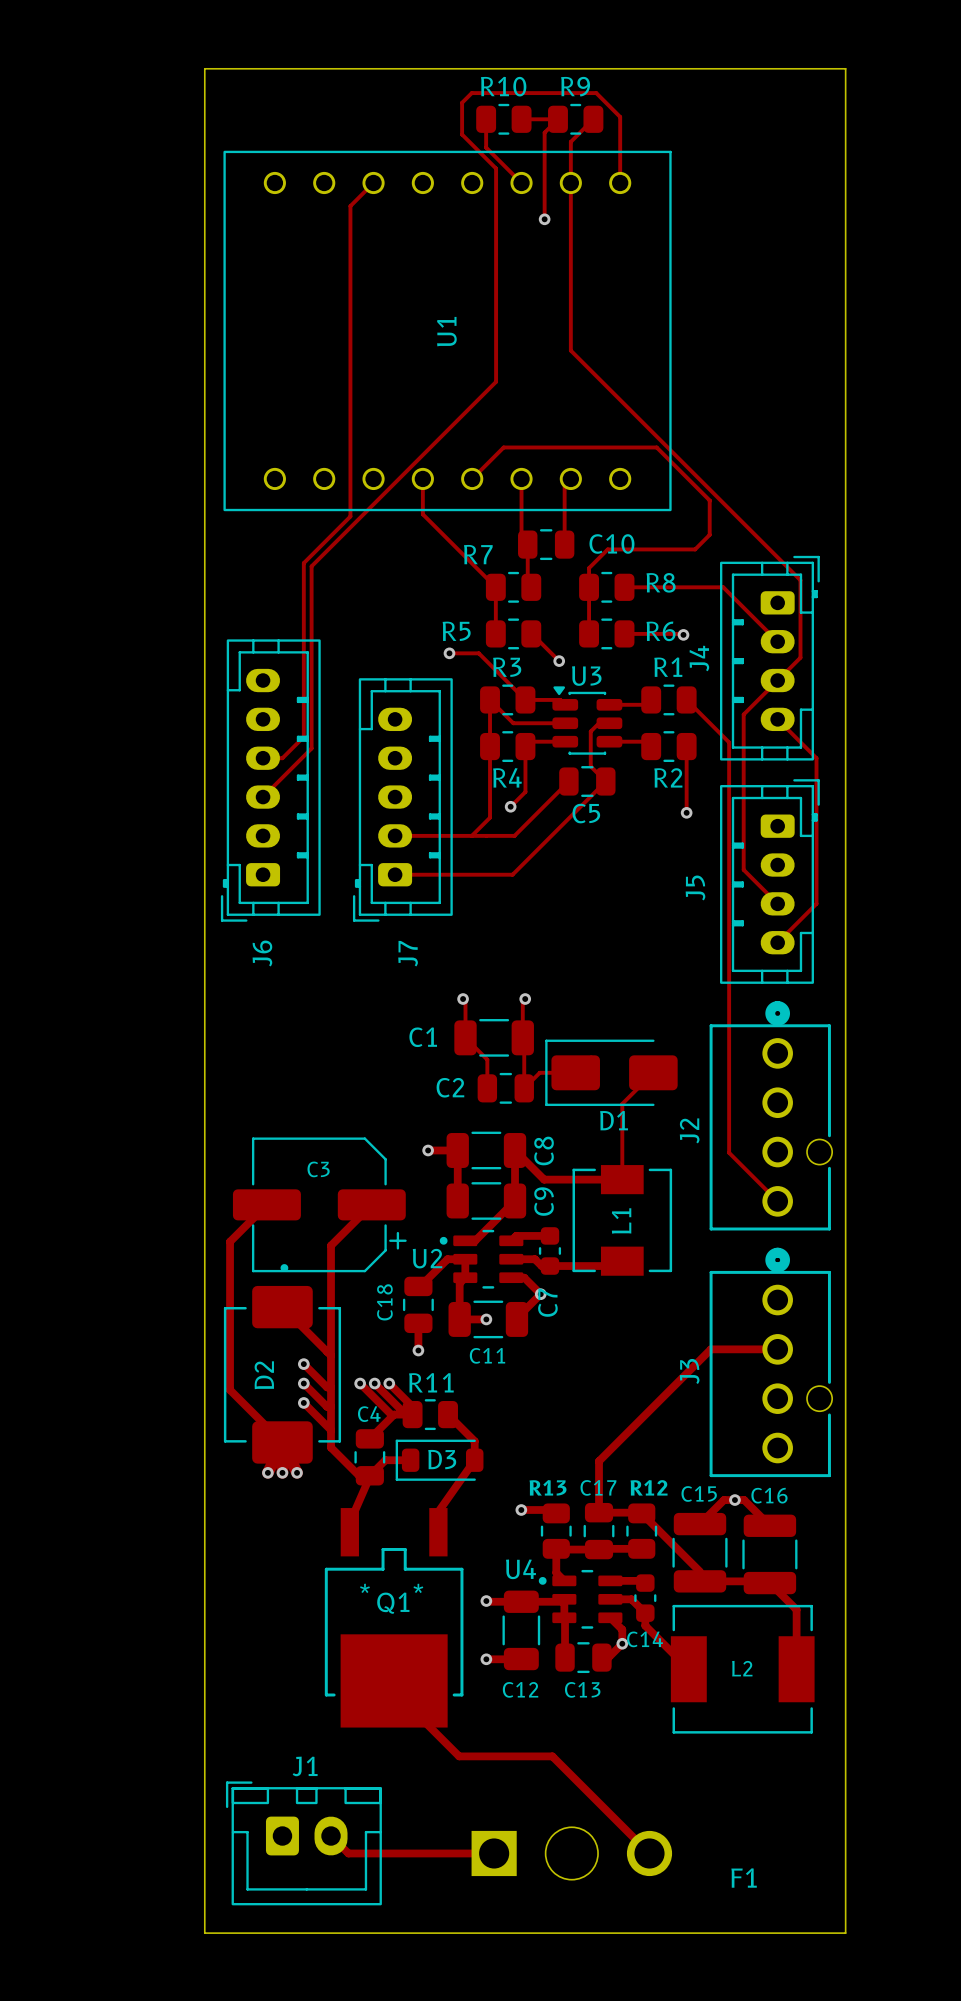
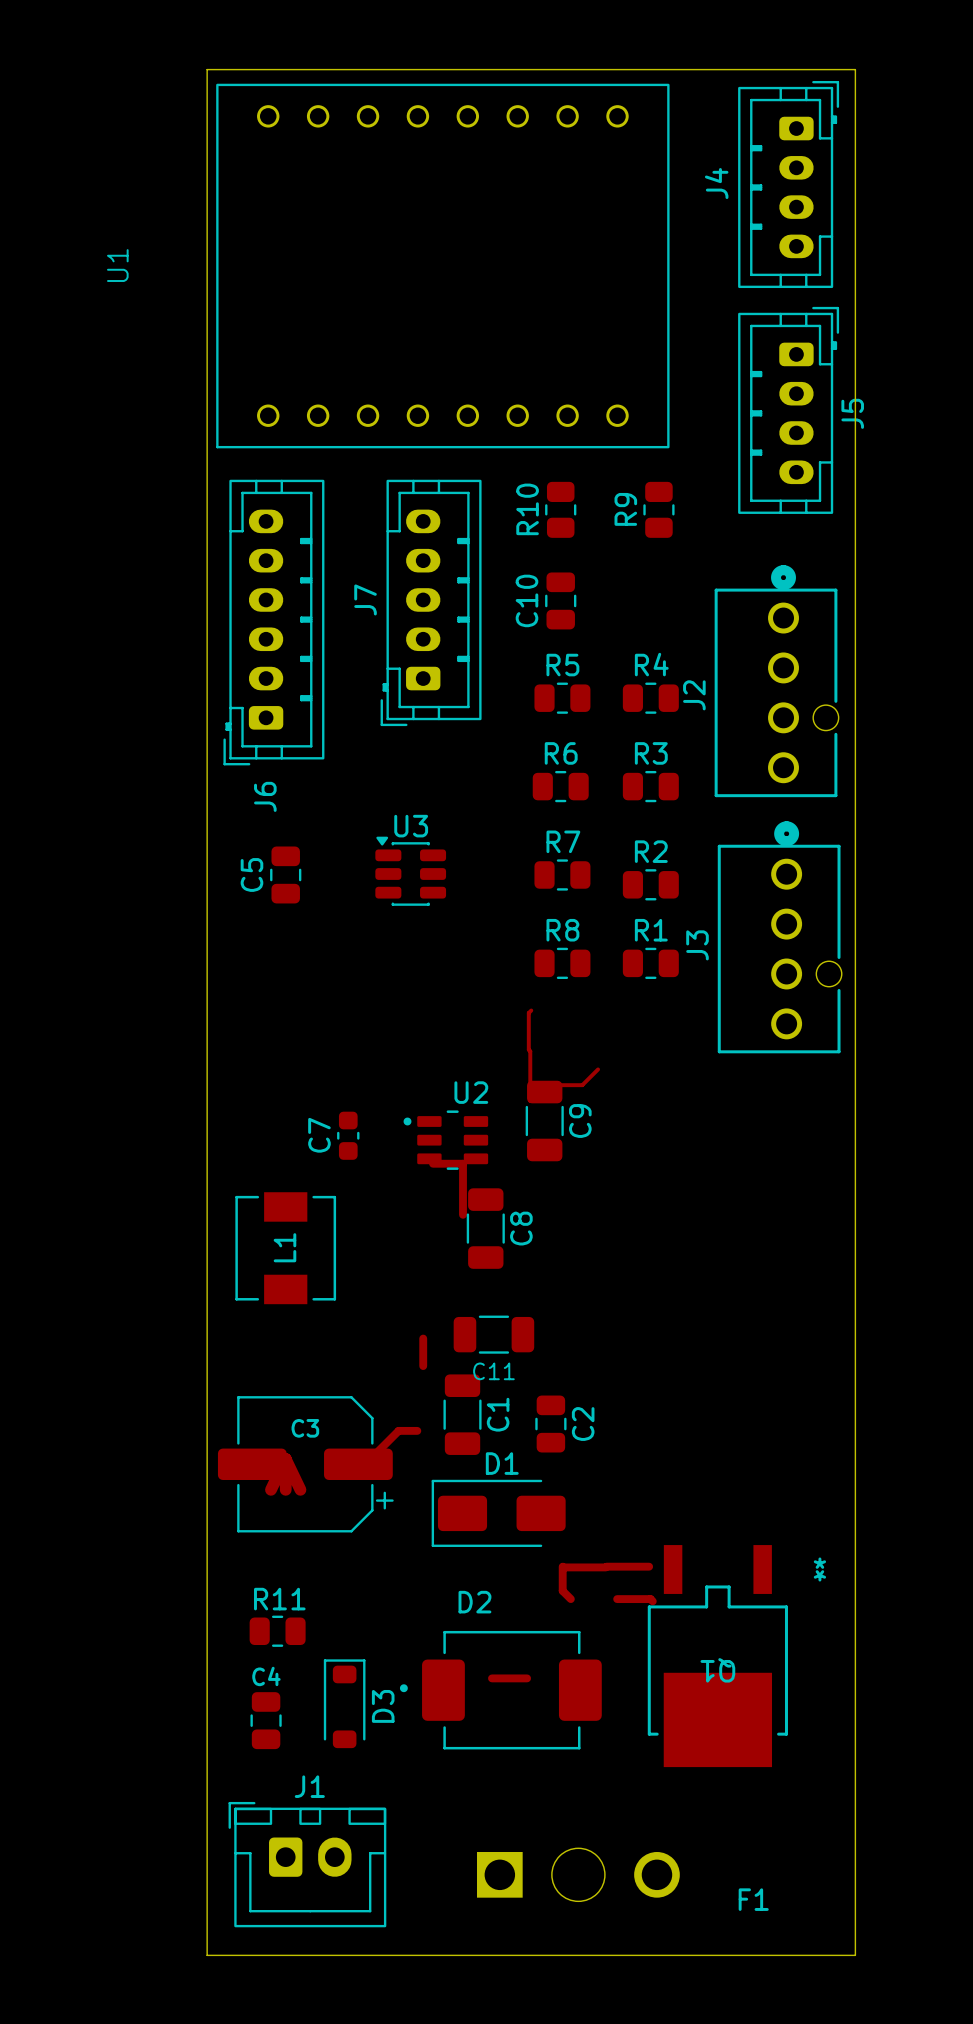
R10 name position: R10 (503, 86) -> R10 (527, 509)
R9 name position: R9 (575, 86) -> R9 (625, 509)
track: (486, 119) (486, 147) (521, 182) -> none
R10 rotation: 0° (503, 119) -> 90° clockwise (560, 509)
R10 position: (503, 119) -> (560, 509)
track: (521, 119) (557, 119) (544, 132) (544, 219) -> none
R9 rotation: 0° (575, 119) -> 90° clockwise (658, 509)
R9 position: (575, 119) -> (658, 509)
track: (593, 119) (570, 141) (570, 350) (800, 580) (800, 657) (743, 714) (743, 869) (777, 903) -> none
track: (373, 182) (350, 206) (350, 516) (303, 563) (303, 736) (282, 758) (263, 758) -> none
track: (620, 182) (620, 116) (596, 93) (471, 93) (462, 102) (462, 134) (496, 168) (496, 381) (311, 566) (311, 748) (263, 797) -> none
via: (544, 219) -> none
U1 position: (447, 330) -> (442, 266)
U1 name position: U1 (446, 331) -> U1 (117, 265)
track: (422, 478) (422, 514) (495, 587) (495, 633) -> none
track: (472, 478) (503, 447) (656, 447) (709, 500) -> none
track: (521, 478) (521, 538) (527, 544) (527, 583) (531, 587) -> none
track: (570, 478) (564, 485) (564, 544) -> none
track: (709, 500) (709, 534) (695, 549) (607, 549) (589, 568) (589, 633) -> none
C10 name position: C10 (611, 543) -> C10 (526, 600)
C10 rotation: 0° (546, 544) -> 90° clockwise (560, 600)
C10 position: (546, 544) -> (560, 600)
R7 name position: R7 (478, 554) -> R7 (563, 841)
R8 name position: R8 (661, 582) -> R8 (562, 930)
R7 position: (513, 587) -> (562, 874)
R8 position: (606, 587) -> (562, 963)
track: (624, 587) (723, 587) (777, 641) -> none
R5 name position: R5 (456, 631) -> R5 (562, 665)
R6 name position: R6 (661, 631) -> R6 (561, 753)
R5 position: (513, 633) -> (562, 698)
track: (531, 633) (559, 661) -> none
R6 position: (606, 633) -> (560, 786)
track: (624, 633) (683, 634) -> none
via: (683, 634) -> none
track: (449, 653) (478, 653) (525, 699) (560, 699) (565, 704) -> none
via: (449, 653) -> none
J4 position: (769, 658) -> (788, 184)
via: (559, 661) -> none
R3 position: (507, 699) -> (650, 786)
track: (651, 699) (646, 704) (609, 704) -> none
R1 position: (668, 699) -> (650, 963)
track: (686, 699) (729, 742) (729, 1152) (777, 1201) -> none
track: (777, 719) (816, 758) (816, 903) (777, 942) -> none
U3 position: (587, 720) -> (410, 871)
track: (565, 723) (513, 723) (490, 699) (490, 817) (471, 835) -> none
track: (609, 723) (599, 723) (590, 731) (590, 766) (605, 781) (512, 874) (395, 874) -> none
track: (565, 741) (530, 741) (525, 746) (525, 791) (510, 806) -> none
track: (609, 741) (646, 741) (651, 746) -> none
R4 position: (507, 746) -> (650, 698)
R2 position: (668, 746) -> (650, 884)
track: (686, 746) (686, 812) -> none
R4 name position: R4 (507, 777) -> R4 (651, 664)
R2 name position: R2 (668, 777) -> R2 (651, 851)
J6 position: (270, 780) -> (273, 622)
track: (568, 781) (514, 835) (395, 835) -> none
C5 rotation: 0° (587, 781) -> 90° clockwise (285, 874)
C5 position: (587, 781) -> (285, 874)
J7 position: (402, 799) -> (431, 602)
via: (510, 806) -> none
via: (686, 812) -> none
J5 position: (769, 881) -> (788, 410)
J5 name position: J5 (695, 887) -> J5 (852, 413)
J7 name position: J7 (408, 953) -> J7 (365, 599)
track: (463, 999) (465, 1001) (465, 1037) (487, 1059) (487, 1088) -> none
via: (463, 999) -> none
via: (525, 999) -> none
C1 name position: C1 (423, 1037) -> C1 (498, 1414)
C1 rotation: 0° (494, 1037) -> 90° clockwise (462, 1414)
C1 position: (494, 1037) -> (462, 1414)
D1 position: (611, 1072) -> (498, 1513)
track: (653, 1072) (622, 1103) (622, 1179) (544, 1179) (515, 1150) (515, 1200) (475, 1240) (465, 1240) -> none
C2 name position: C2 (450, 1087) -> C2 (583, 1424)
C2 rotation: 0° (505, 1088) -> 90° clockwise (550, 1424)
C2 position: (505, 1088) -> (550, 1424)
J2 position: (770, 1115) -> (776, 681)
D1 name position: D1 (614, 1120) -> D1 (502, 1463)
via: (428, 1150) -> none
C8 rotation: 0° (486, 1150) -> 90° clockwise (485, 1228)
C8 position: (486, 1150) -> (485, 1228)
C9 rotation: 0° (486, 1200) -> 90° clockwise (544, 1121)
C9 position: (486, 1200) -> (544, 1121)
track: (266, 1204) (230, 1241) (230, 1390) (282, 1442) -> none
C3 position: (319, 1204) -> (305, 1464)
track: (371, 1204) (331, 1245) (331, 1447) (359, 1475) (369, 1475) (385, 1460) (410, 1460) -> none
L1 position: (622, 1220) -> (285, 1248)
track: (549, 1235) (516, 1235) (511, 1240) -> none
C7 position: (549, 1250) -> (348, 1135)
U2 name position: U2 (427, 1258) -> U2 (471, 1092)
U2 position: (481, 1259) -> (445, 1140)
track: (511, 1259) (534, 1259) (541, 1266) (617, 1266) (622, 1261) -> none
track: (511, 1277) (524, 1277) (540, 1294) (521, 1313) -> none
track: (418, 1286) (447, 1259) (465, 1259) (465, 1277) (459, 1283) (459, 1319) (486, 1319) -> none
via: (540, 1294) -> none
C7 name position: C7 (547, 1302) -> C7 (319, 1135)
C18: (418, 1304) -> none
track: (282, 1307) (331, 1355) -> none
via: (486, 1319) -> none
track: (777, 1349) (710, 1349) (599, 1461) (599, 1512) (641, 1513) -> none
via: (418, 1350) -> none
J3 position: (770, 1362) -> (779, 937)
D2 rotation: 0° (282, 1363) -> 90° counterclockwise (500, 1690)
D2 position: (282, 1363) -> (500, 1690)
track: (303, 1364) (327, 1387) (331, 1387) -> none
via: (303, 1364) -> none
D2 name position: D2 (264, 1375) -> D2 (474, 1602)
track: (303, 1383) (327, 1406) (331, 1406) -> none
via: (303, 1383) -> none
track: (360, 1383) (391, 1414) -> none
via: (360, 1383) -> none
track: (374, 1383) (405, 1414) (412, 1414) (412, 1406) (389, 1383) -> none
via: (374, 1383) -> none
via: (389, 1383) -> none
track: (303, 1402) (331, 1430) -> none
via: (303, 1402) -> none
R11 position: (430, 1414) -> (277, 1631)
track: (448, 1414) (474, 1441) (474, 1460) (435, 1515) -> none
C4 position: (369, 1457) -> (266, 1720)
D3 rotation: 0° (439, 1460) -> 90° clockwise (344, 1703)
D3 position: (439, 1460) -> (344, 1703)
via: (267, 1472) -> none
via: (282, 1472) -> none
via: (297, 1472) -> none
track: (369, 1476) (347, 1527) -> none
via: (734, 1500) -> none
Q1 footprint: [324, 1508, 464, 1728] -> [647, 1545, 788, 1768]
track: (521, 1510) (552, 1510) (556, 1513) -> none
via: (521, 1510) -> none
track: (641, 1513) (699, 1571) (699, 1581) (768, 1581) (796, 1609) (796, 1669) -> none
track: (699, 1524) (724, 1500) (744, 1500) (769, 1525) -> none
R13: (556, 1531) -> none
C17: (599, 1531) -> none
R12: (641, 1531) -> none
C15: (699, 1552) -> none
C16: (769, 1554) -> none
C14: (645, 1598) -> none
U4: (580, 1599) -> none
track: (610, 1599) (631, 1599) (645, 1613) (645, 1625) (688, 1669) -> none
track: (486, 1601) (561, 1601) (564, 1599) (565, 1657) -> none
via: (486, 1601) -> none
track: (610, 1617) (622, 1629) (622, 1643) (608, 1657) (601, 1657) -> none
C12: (521, 1630) -> none
via: (622, 1643) -> none
C13: (583, 1657) -> none
via: (486, 1659) -> none
L2: (742, 1669) -> none
track: (394, 1680) (394, 1691) (459, 1756) (552, 1756) (649, 1853) -> none
track: (331, 1836) (348, 1853) (494, 1853) -> none

